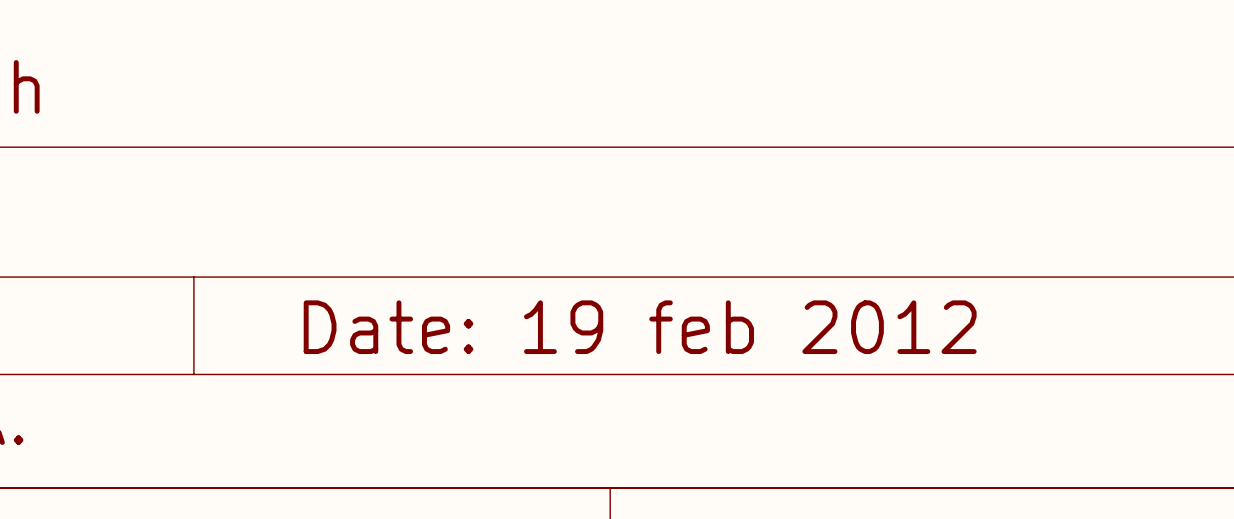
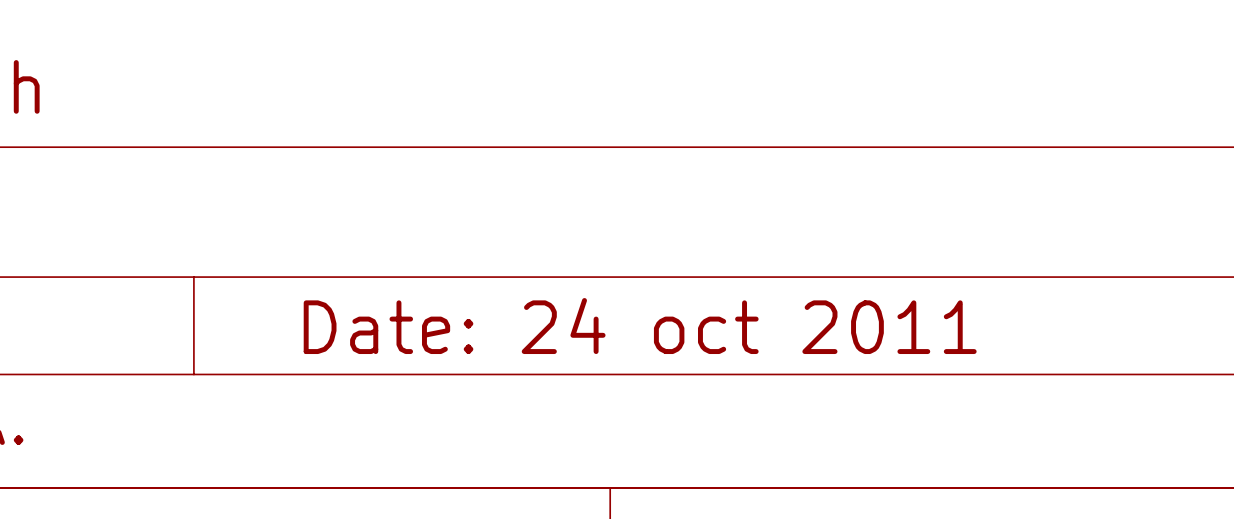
title block: Date: 19 feb 2012 (640, 327) -> Date: 24 oct 2011 (640, 326)

